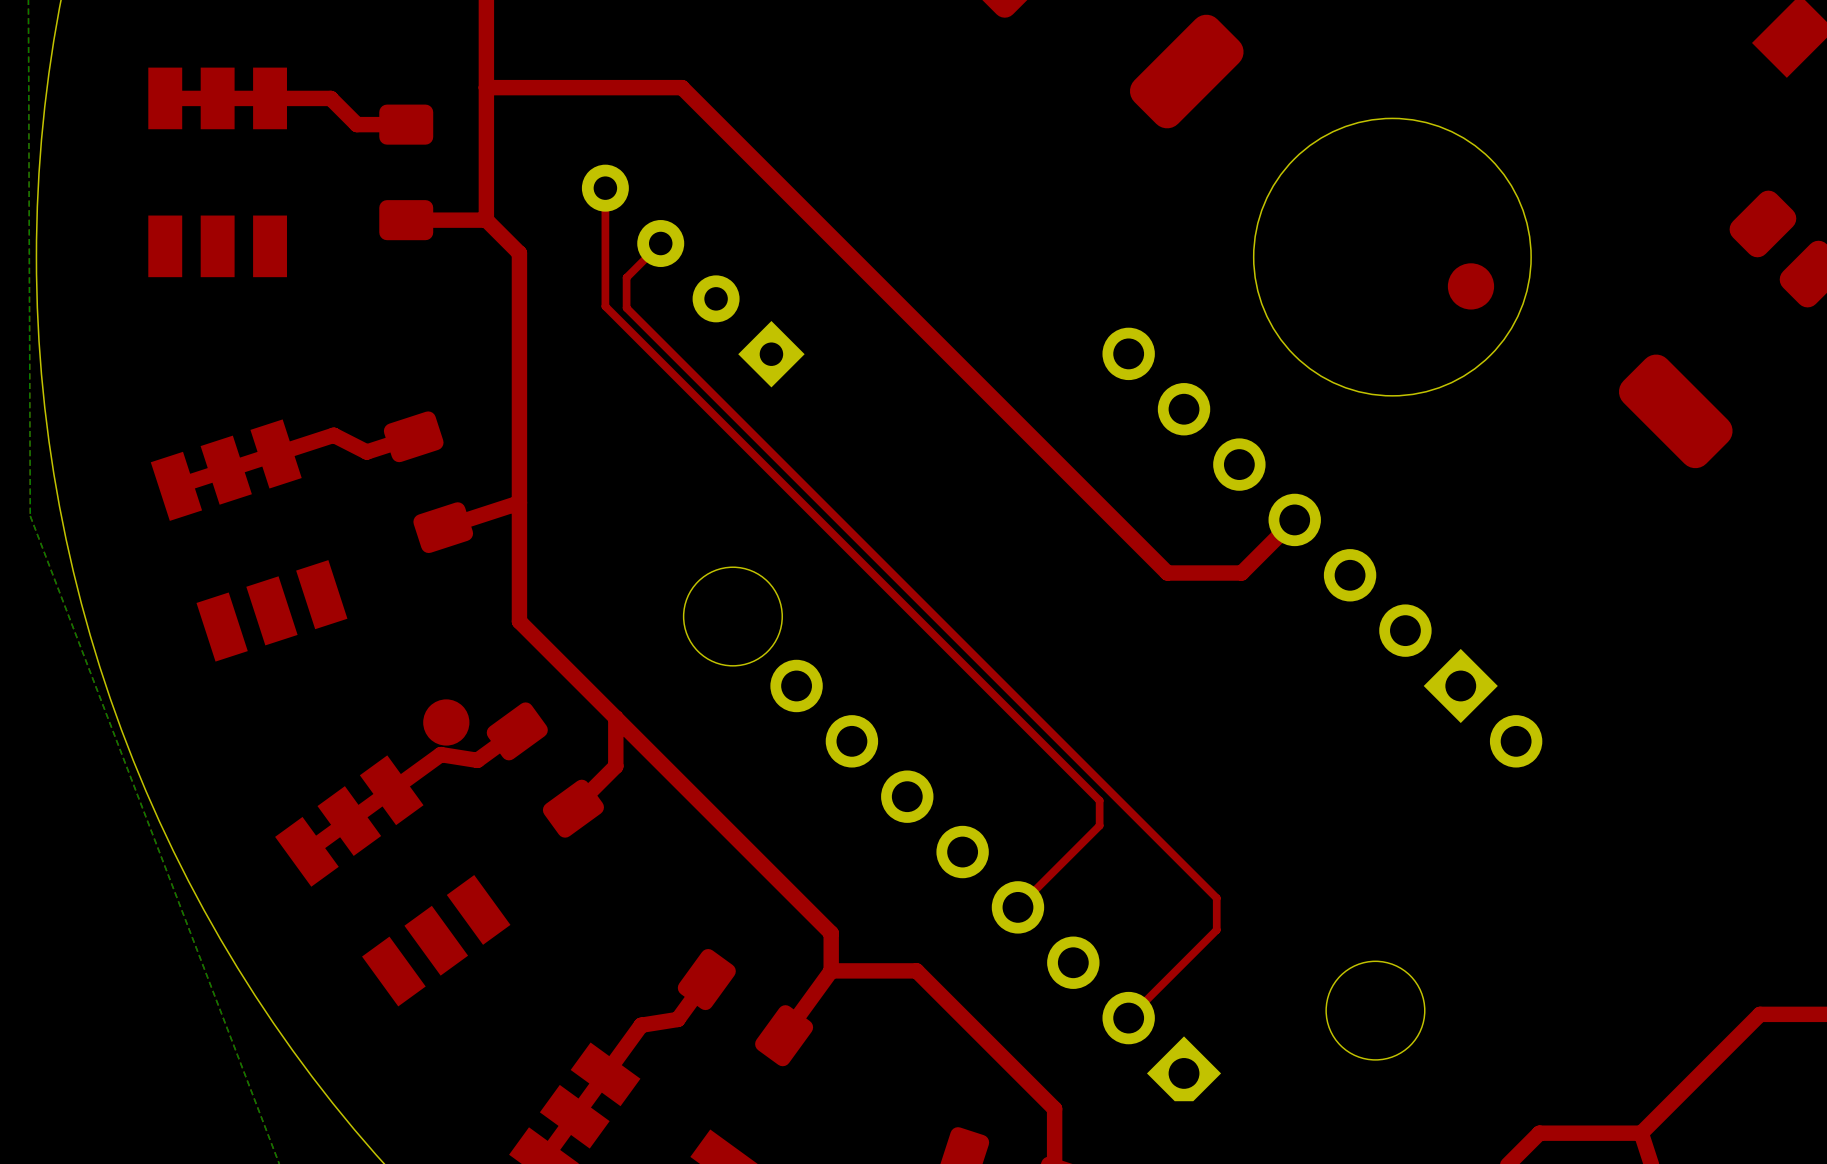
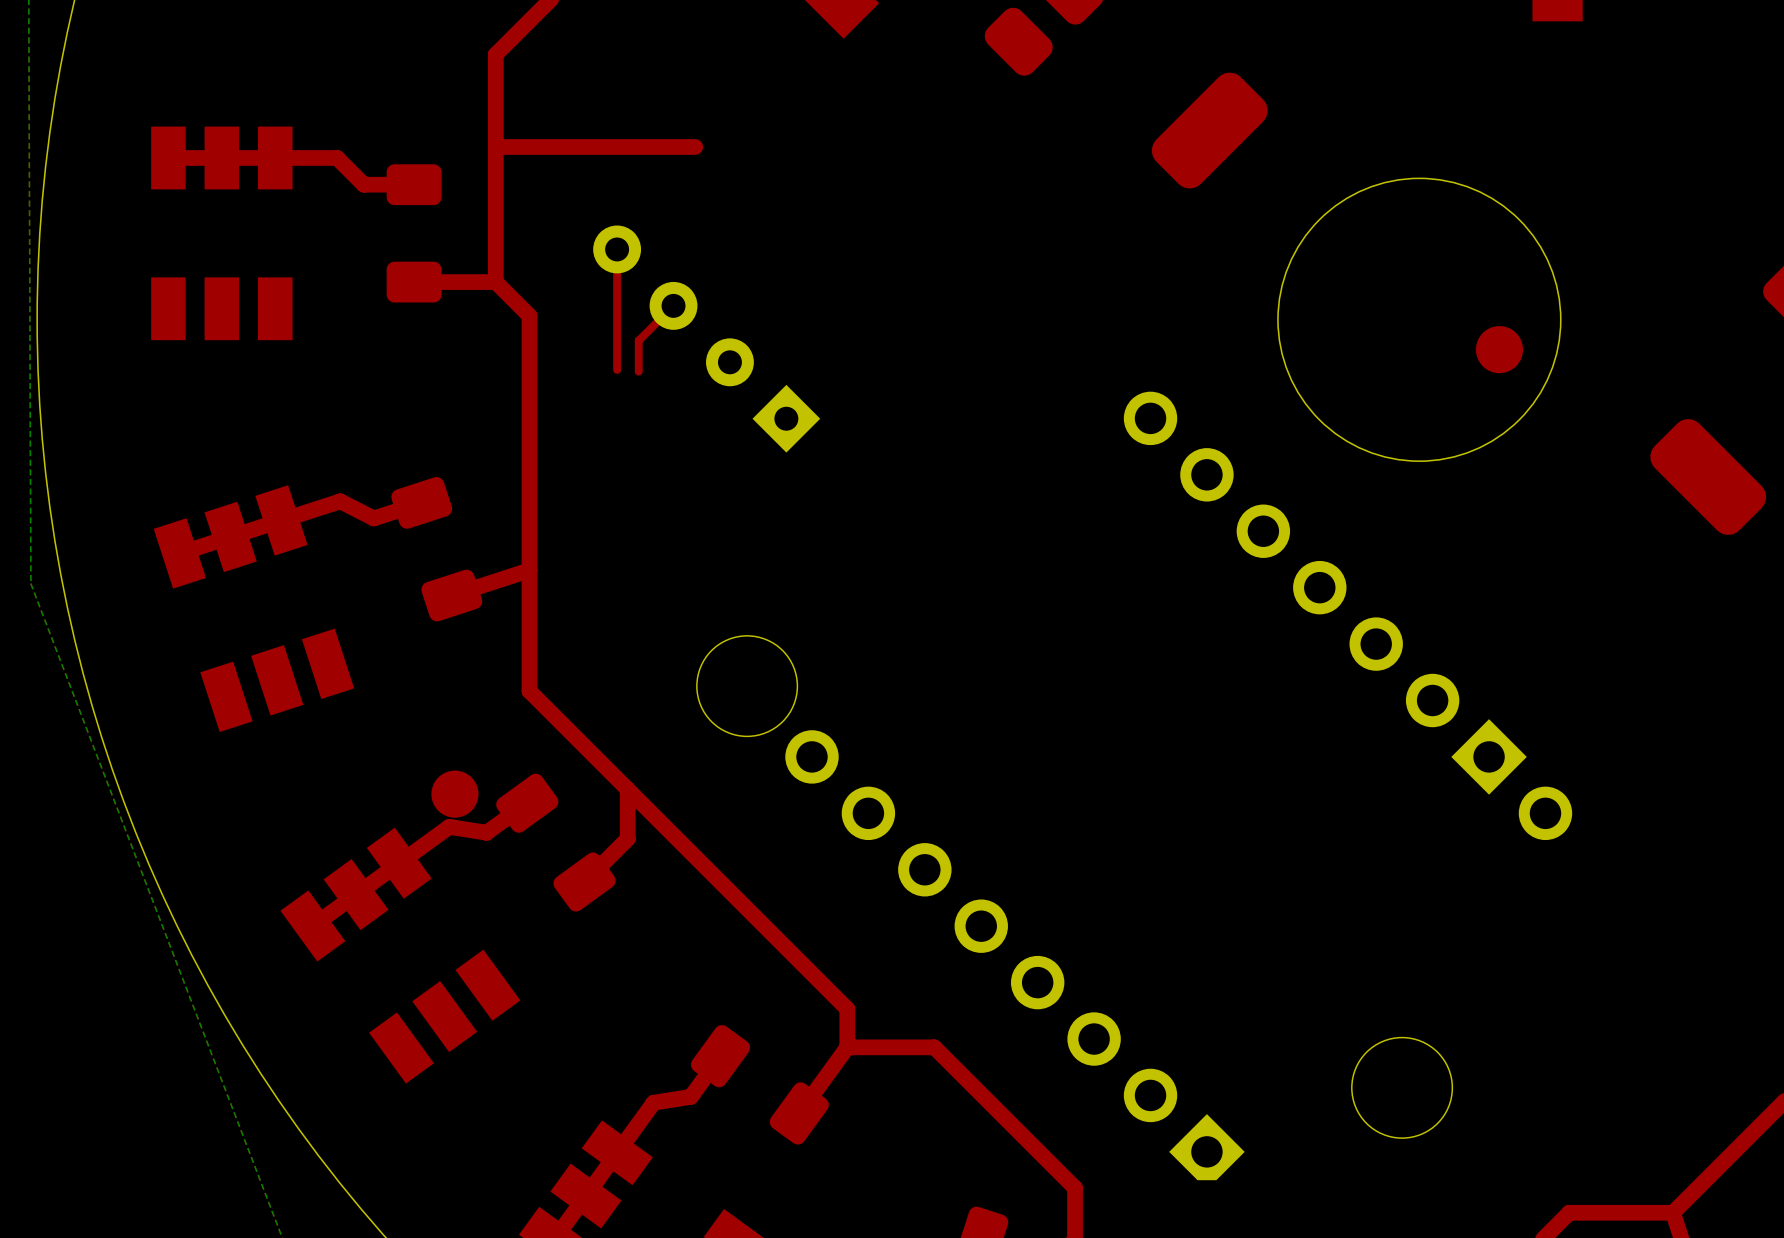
top track: (682, 87) (1167, 573) (1241, 573) (1294, 519) -> none
top track: (605, 306) (1099, 800) (1099, 825) (1017, 907) -> none
top track: (626, 307) (1216, 898) (1216, 930) (1128, 1018) -> none

